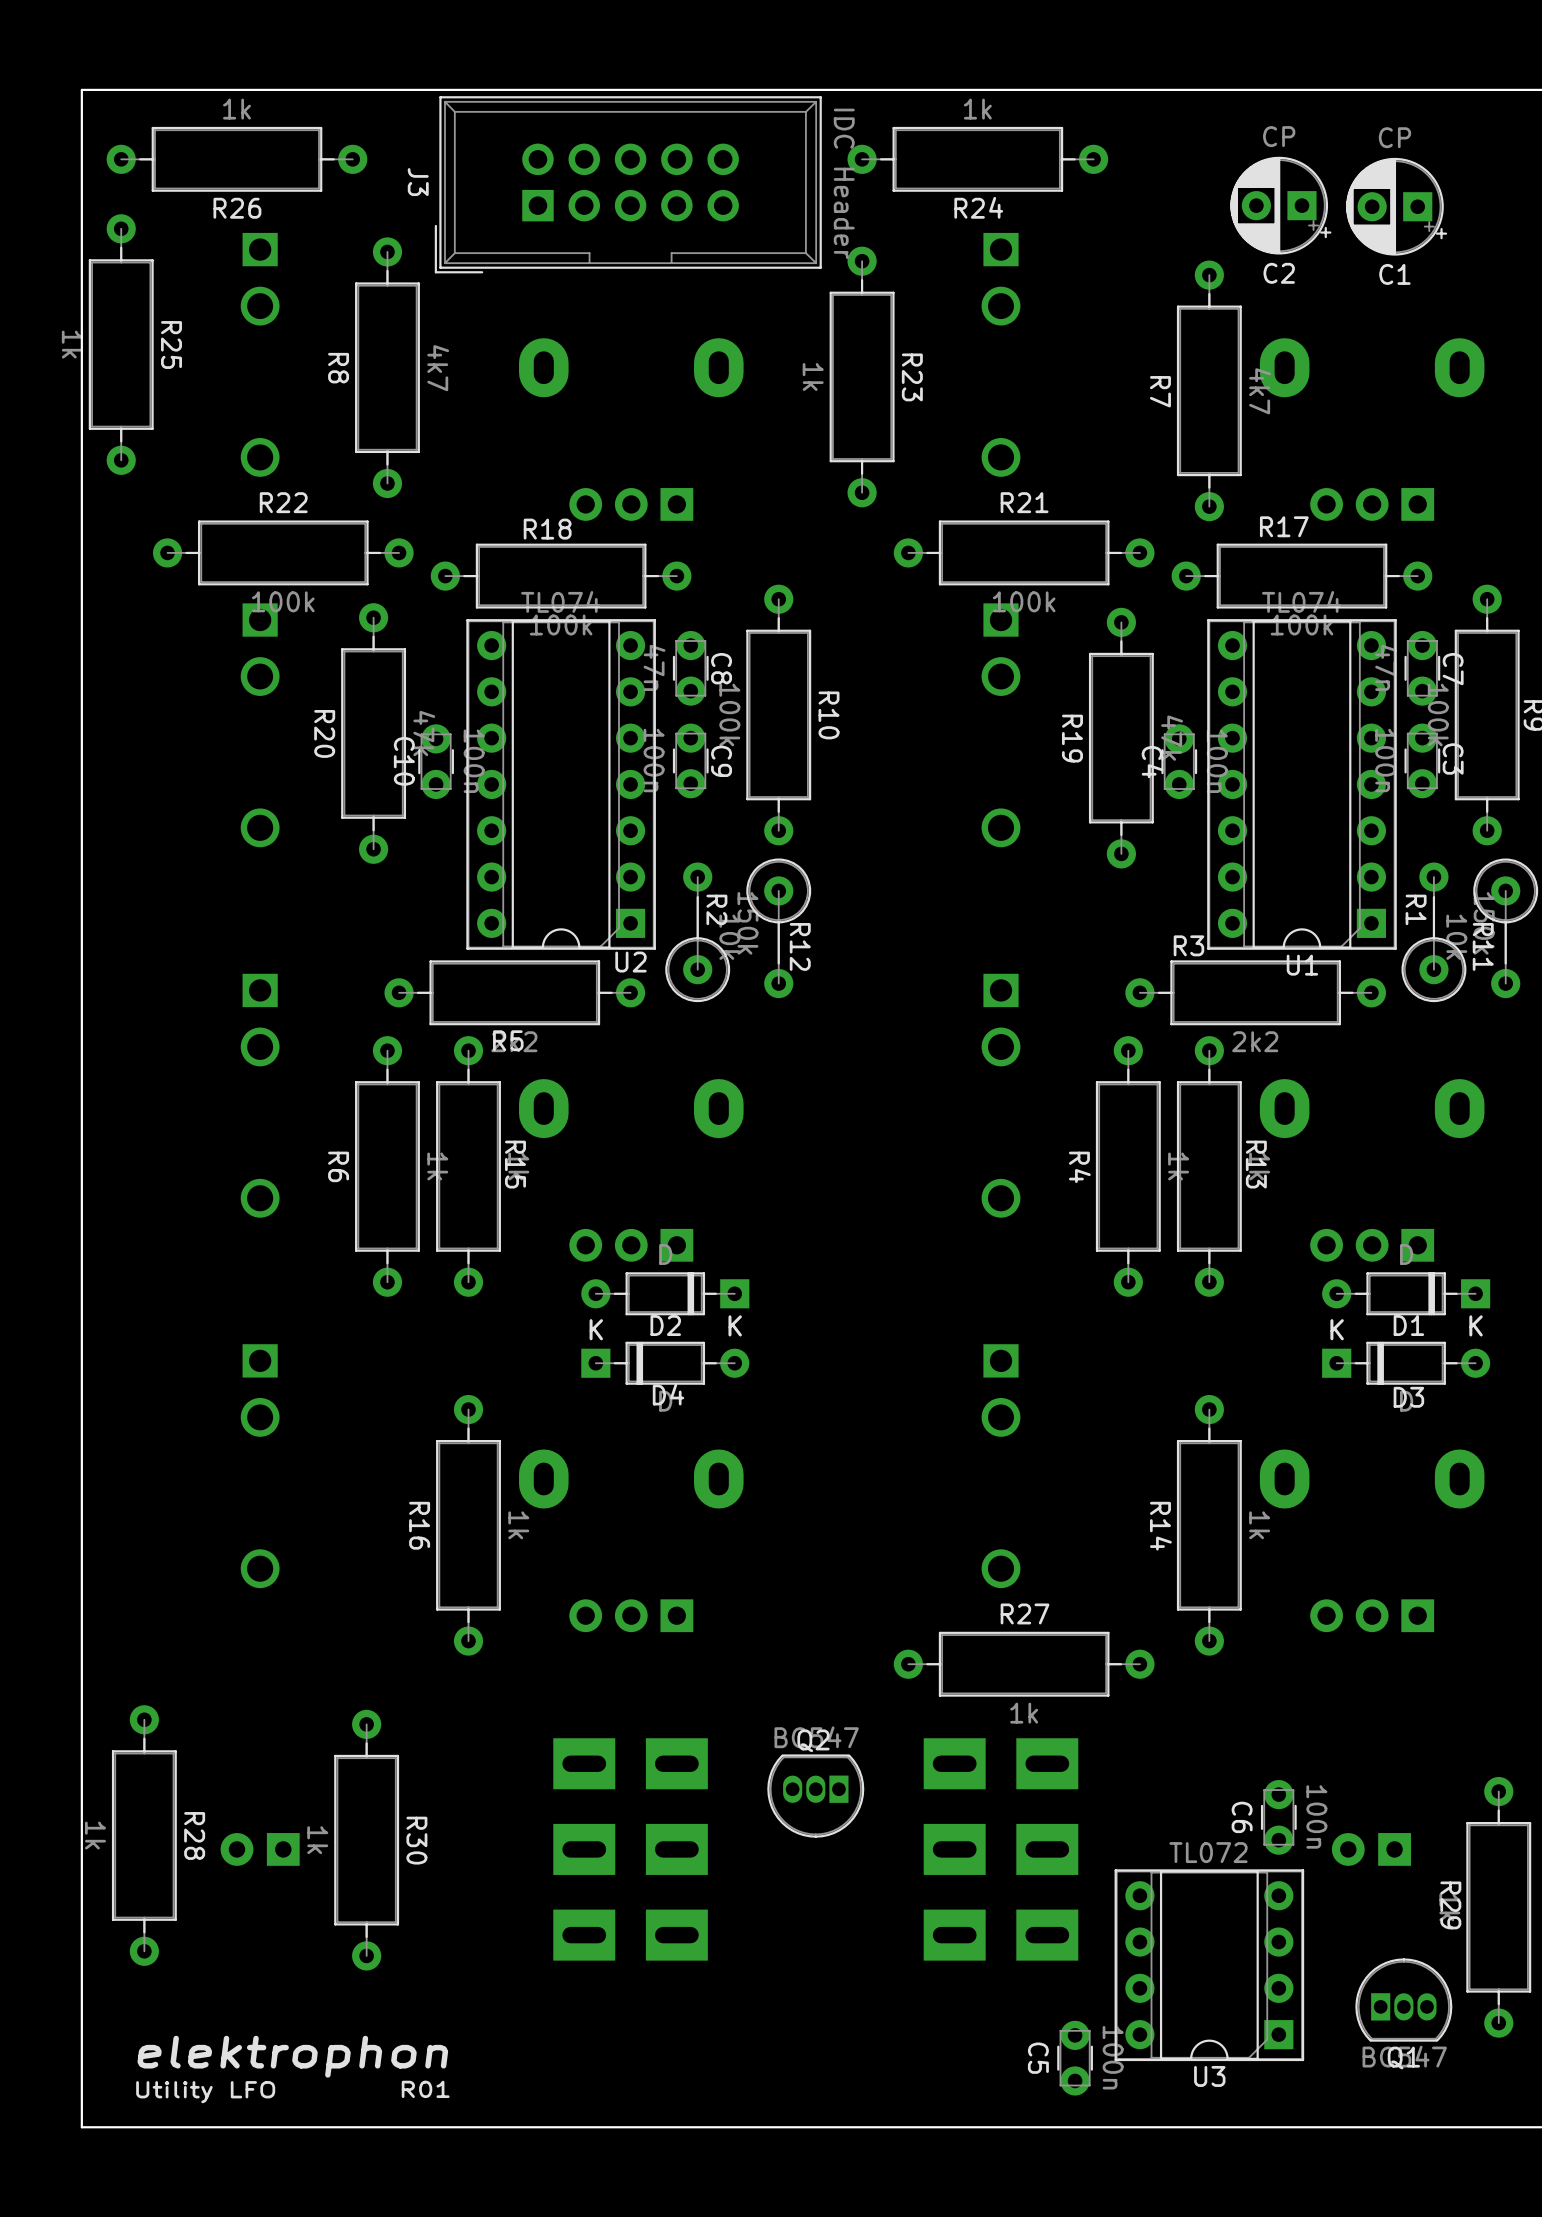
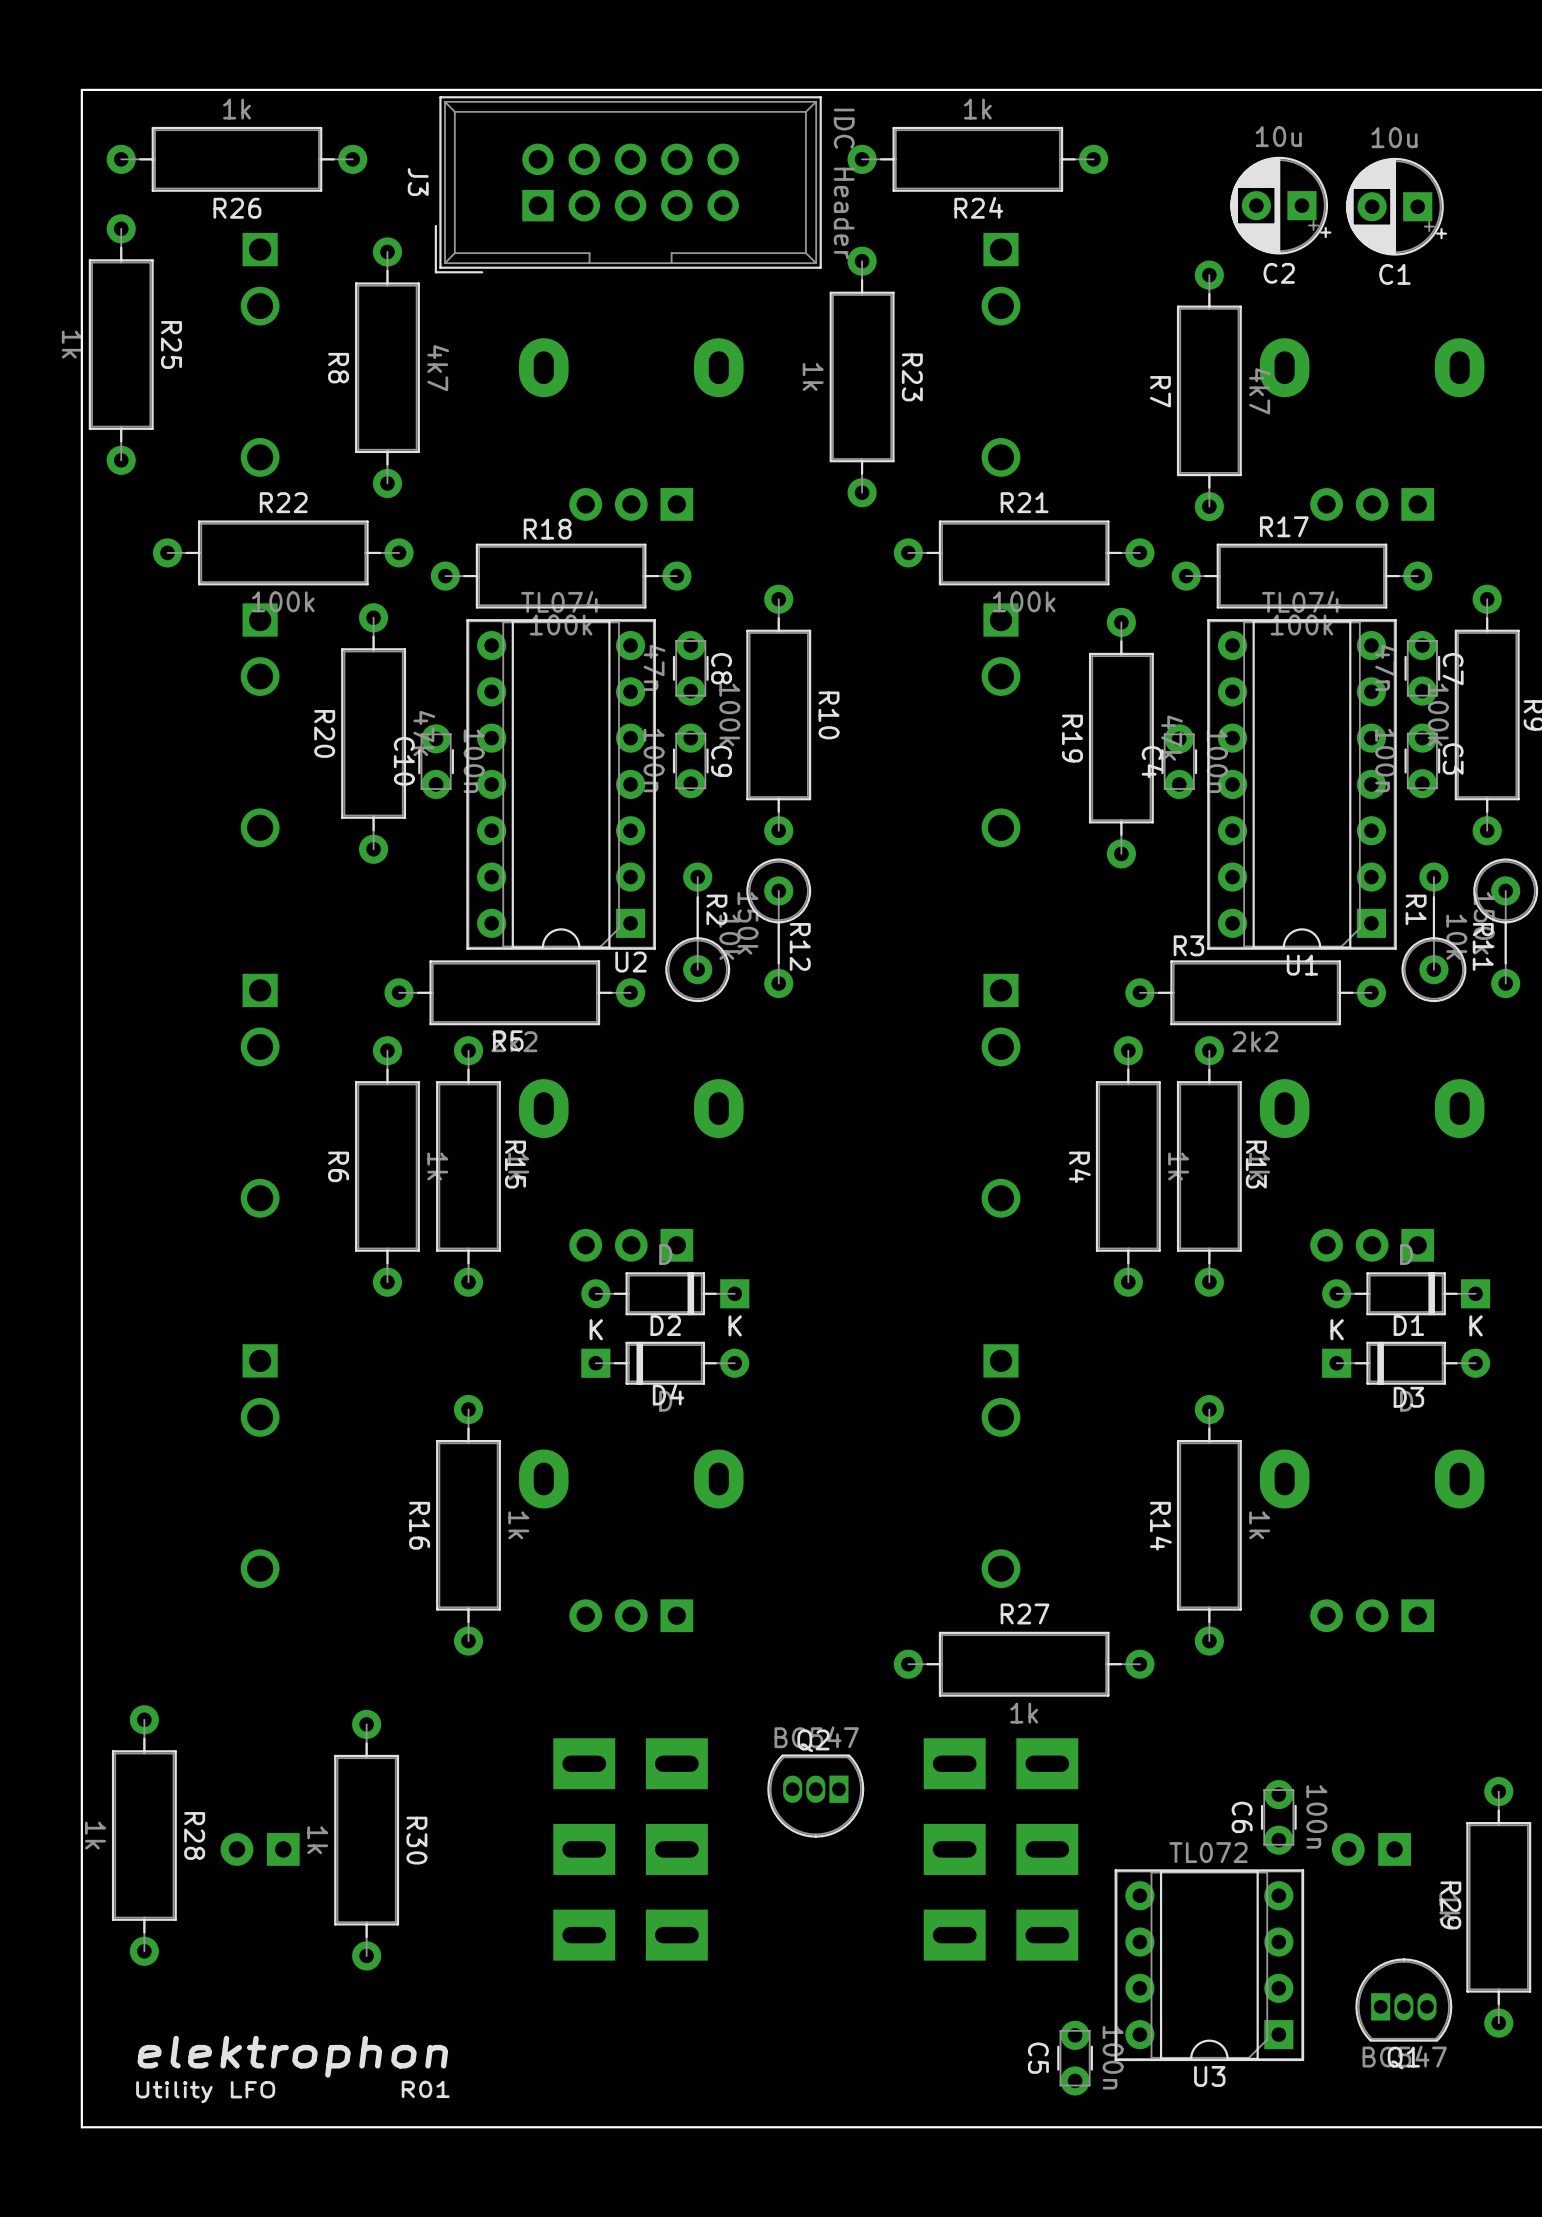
C2 value: CP (1279, 136) -> 10u (1278, 136)
C1 value: CP (1394, 137) -> 10u (1394, 137)

